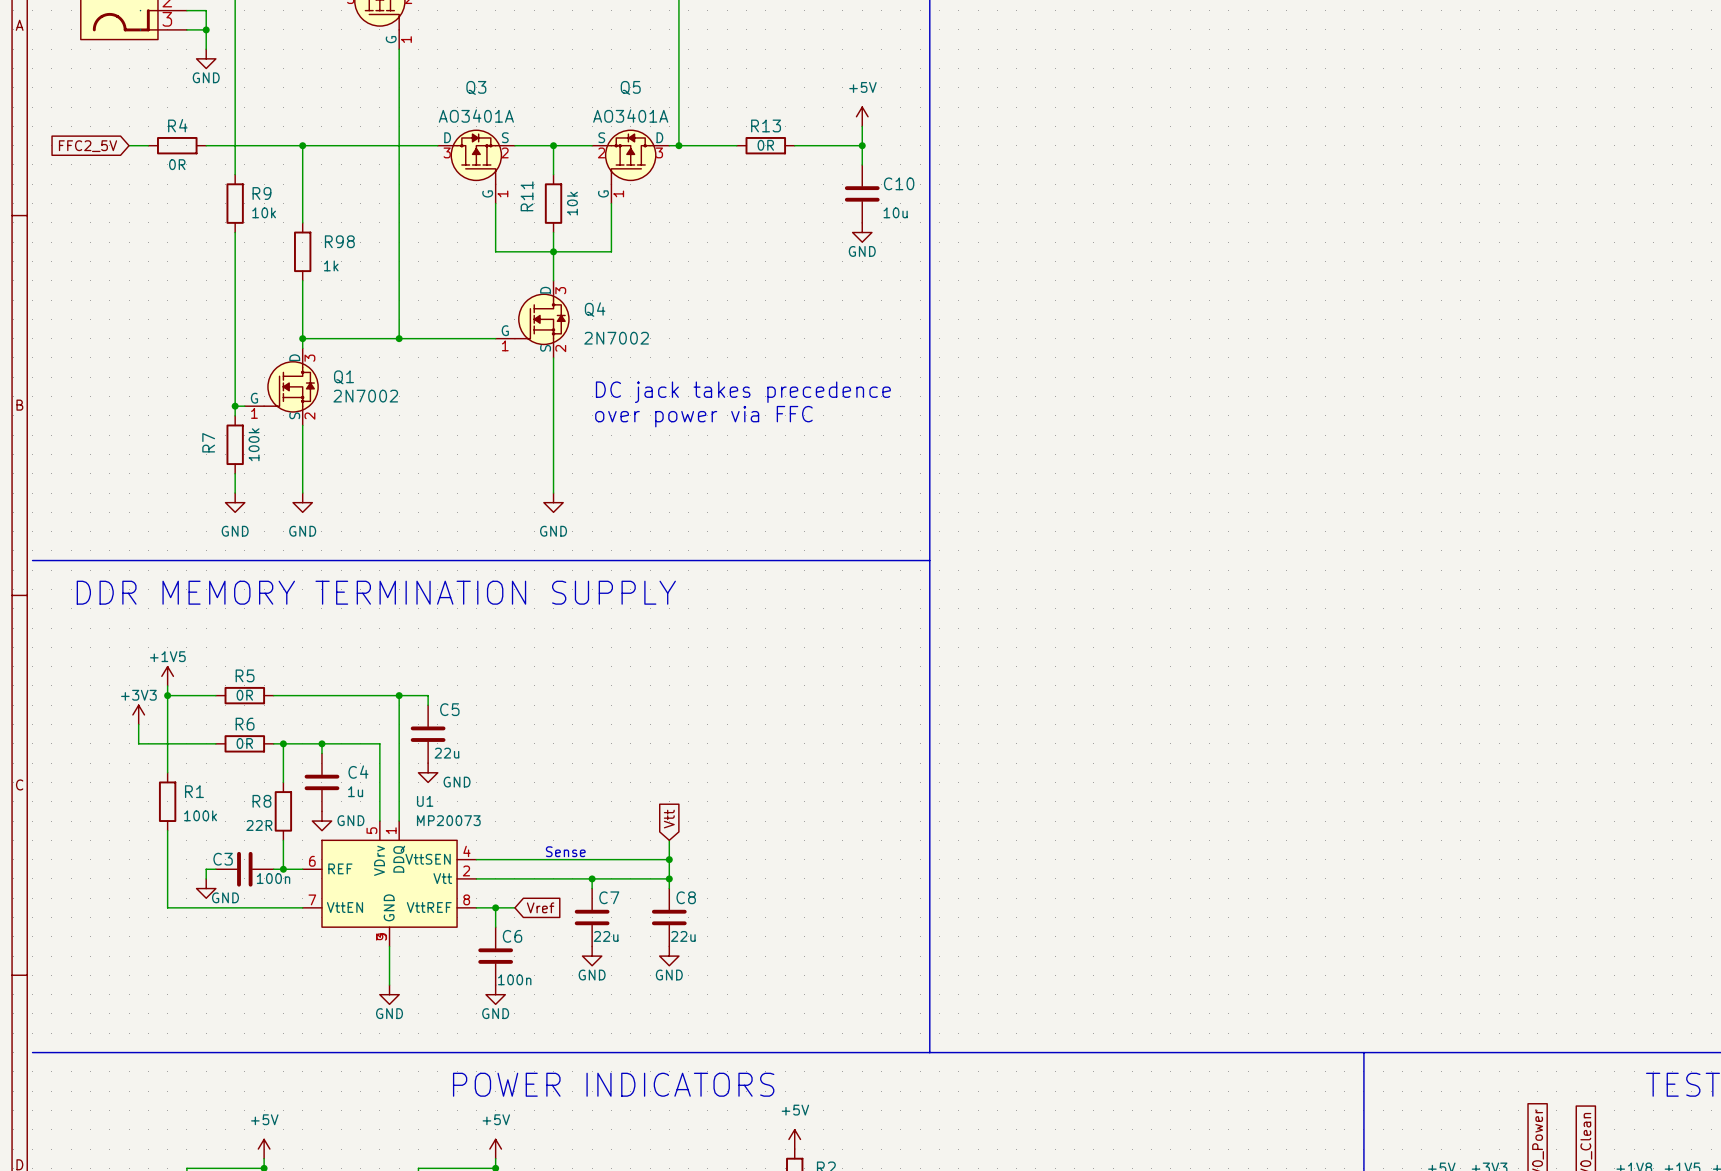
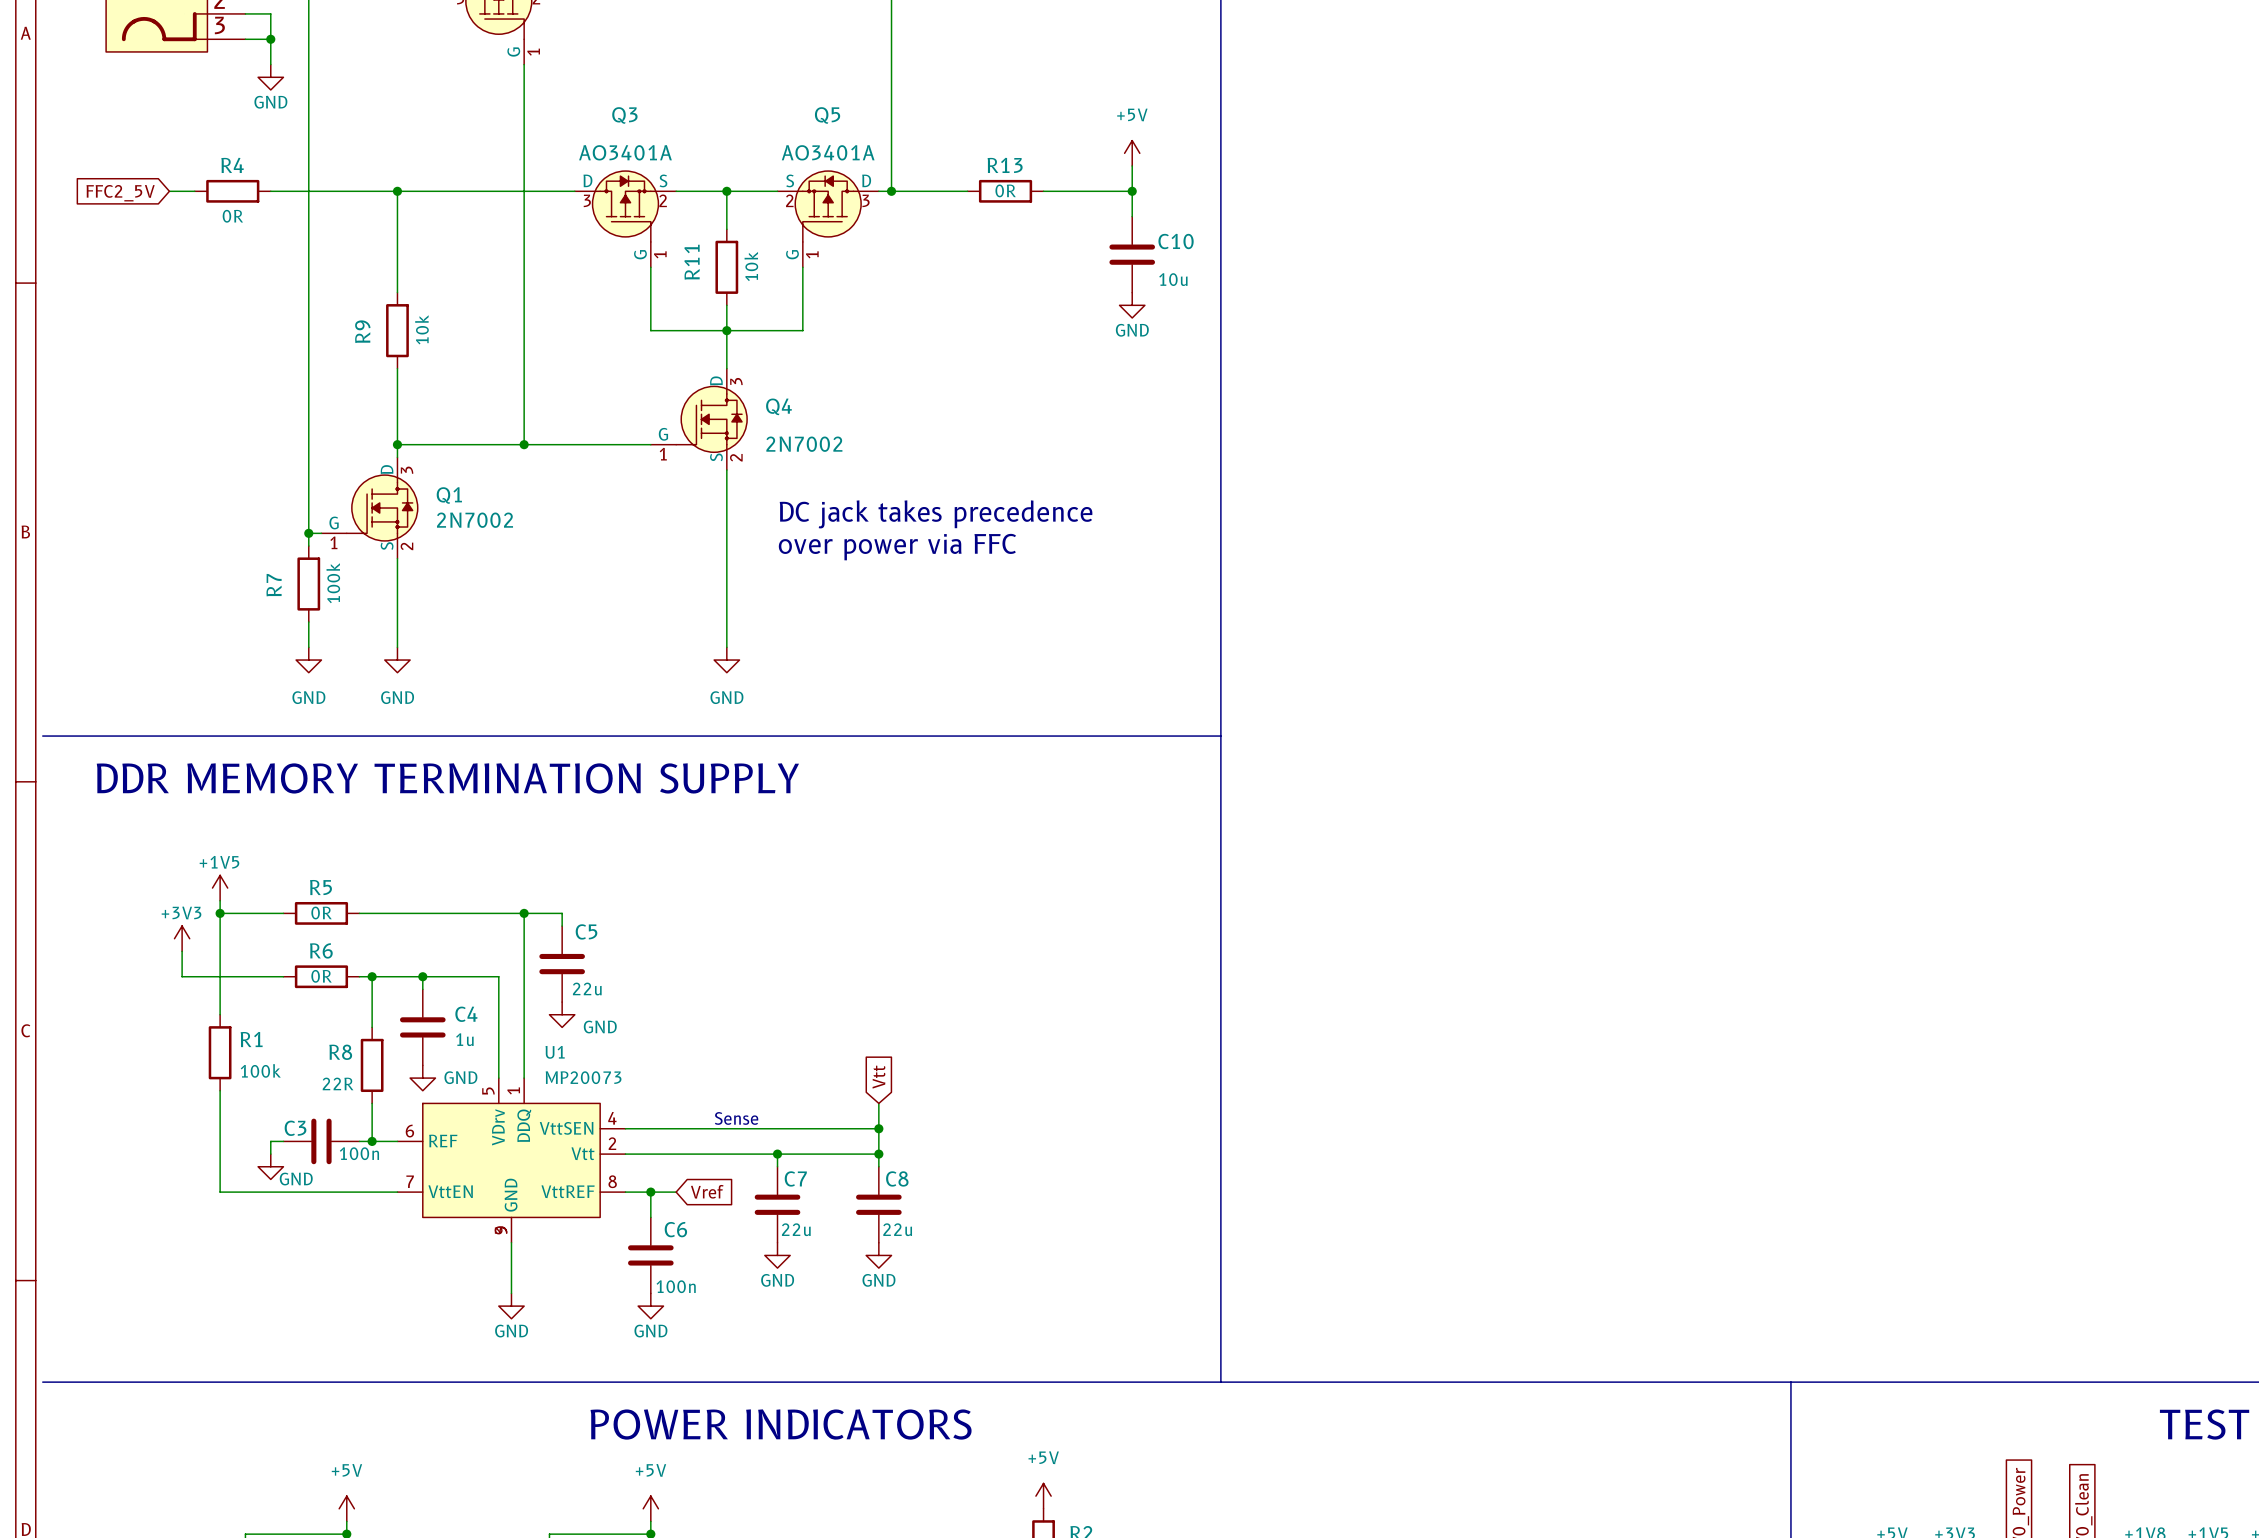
wire: none -> (308, 229) (308, 305)
R9: (235, 203) -> none
R98 name: R98 (339, 241) -> R9 (362, 331)
R98 text: 1k (331, 265) -> 10k (421, 329)

